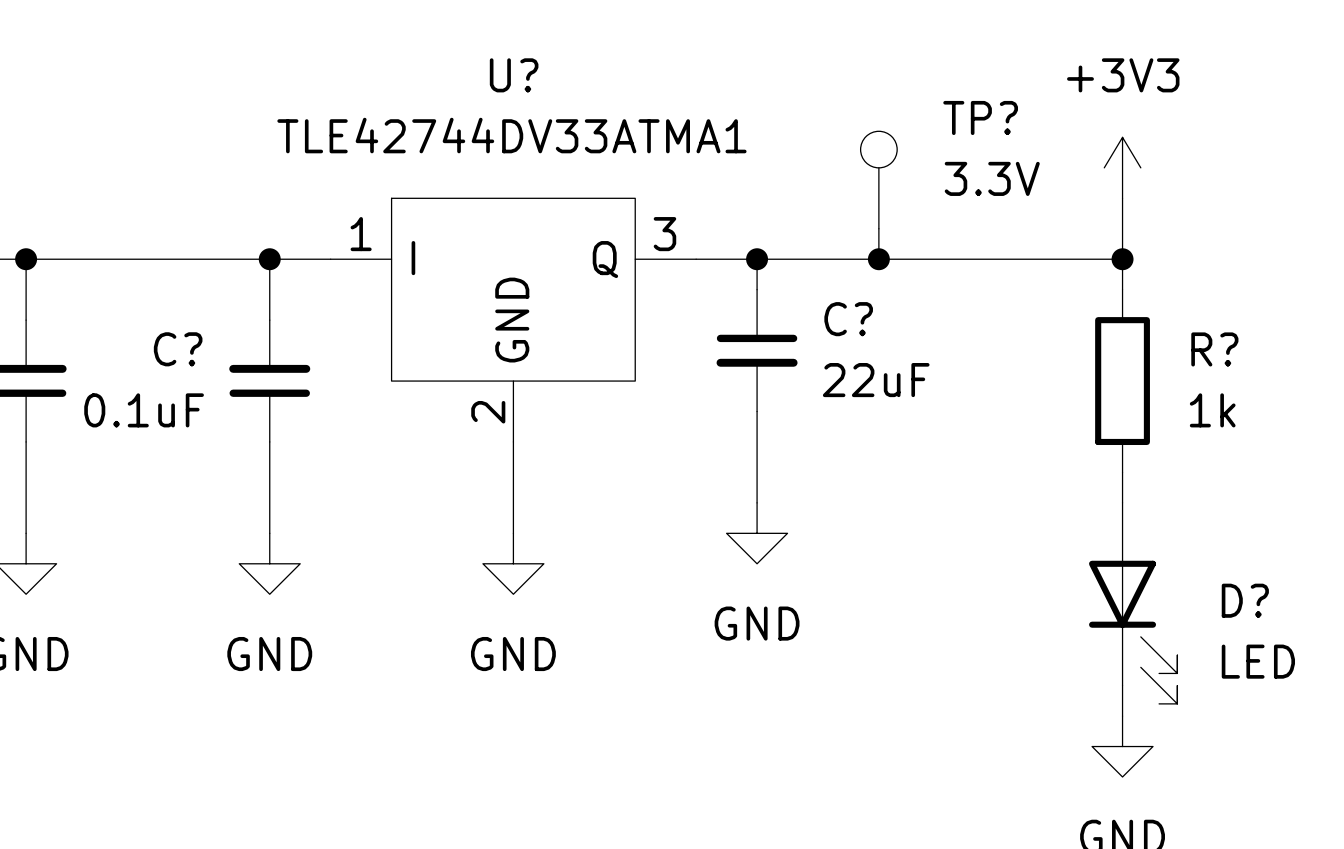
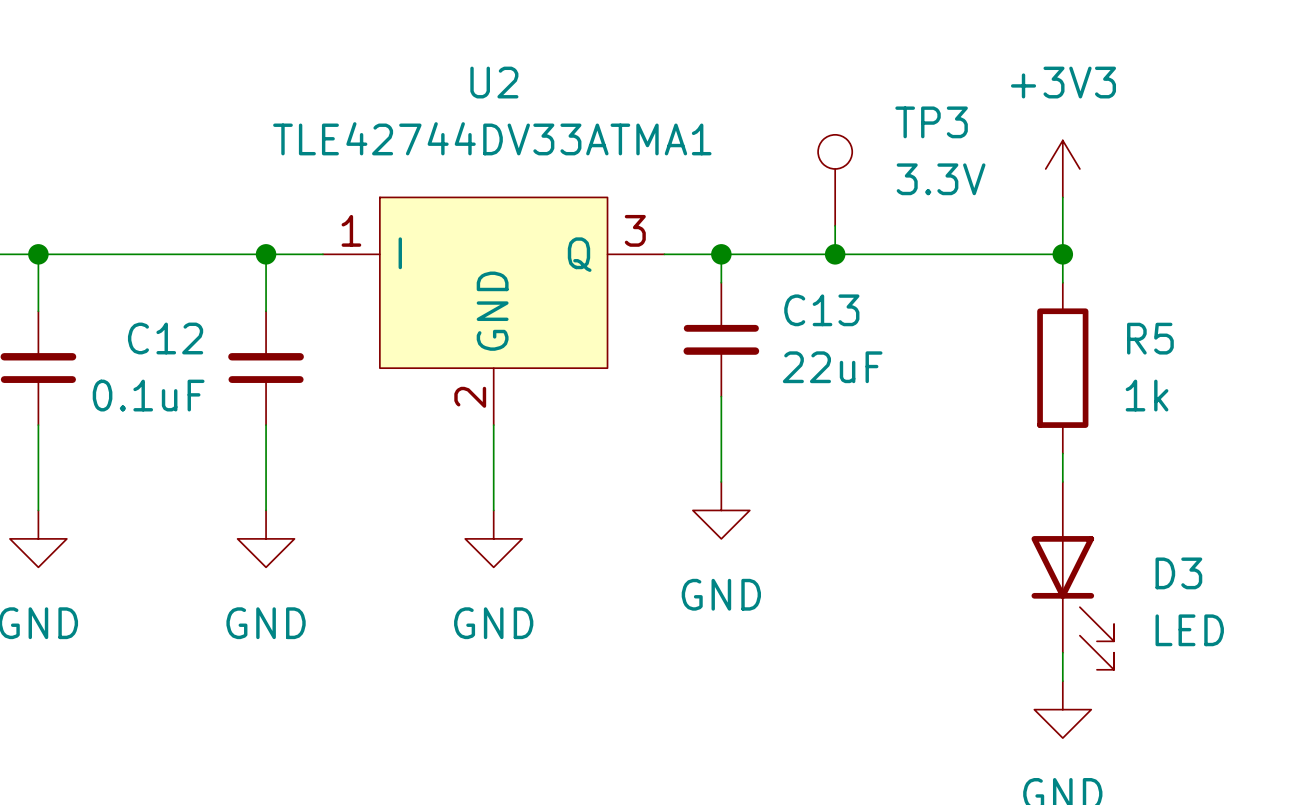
U? name: U? (514, 75) -> U2 (494, 82)
TP? name: TP? (980, 117) -> TP3 (931, 122)
C? name: C? (848, 319) -> C13 (821, 310)
C? name: C? (178, 349) -> C12 (165, 338)
R? name: R? (1214, 349) -> R5 (1150, 338)
D? name: D? (1245, 600) -> D3 (1178, 573)

